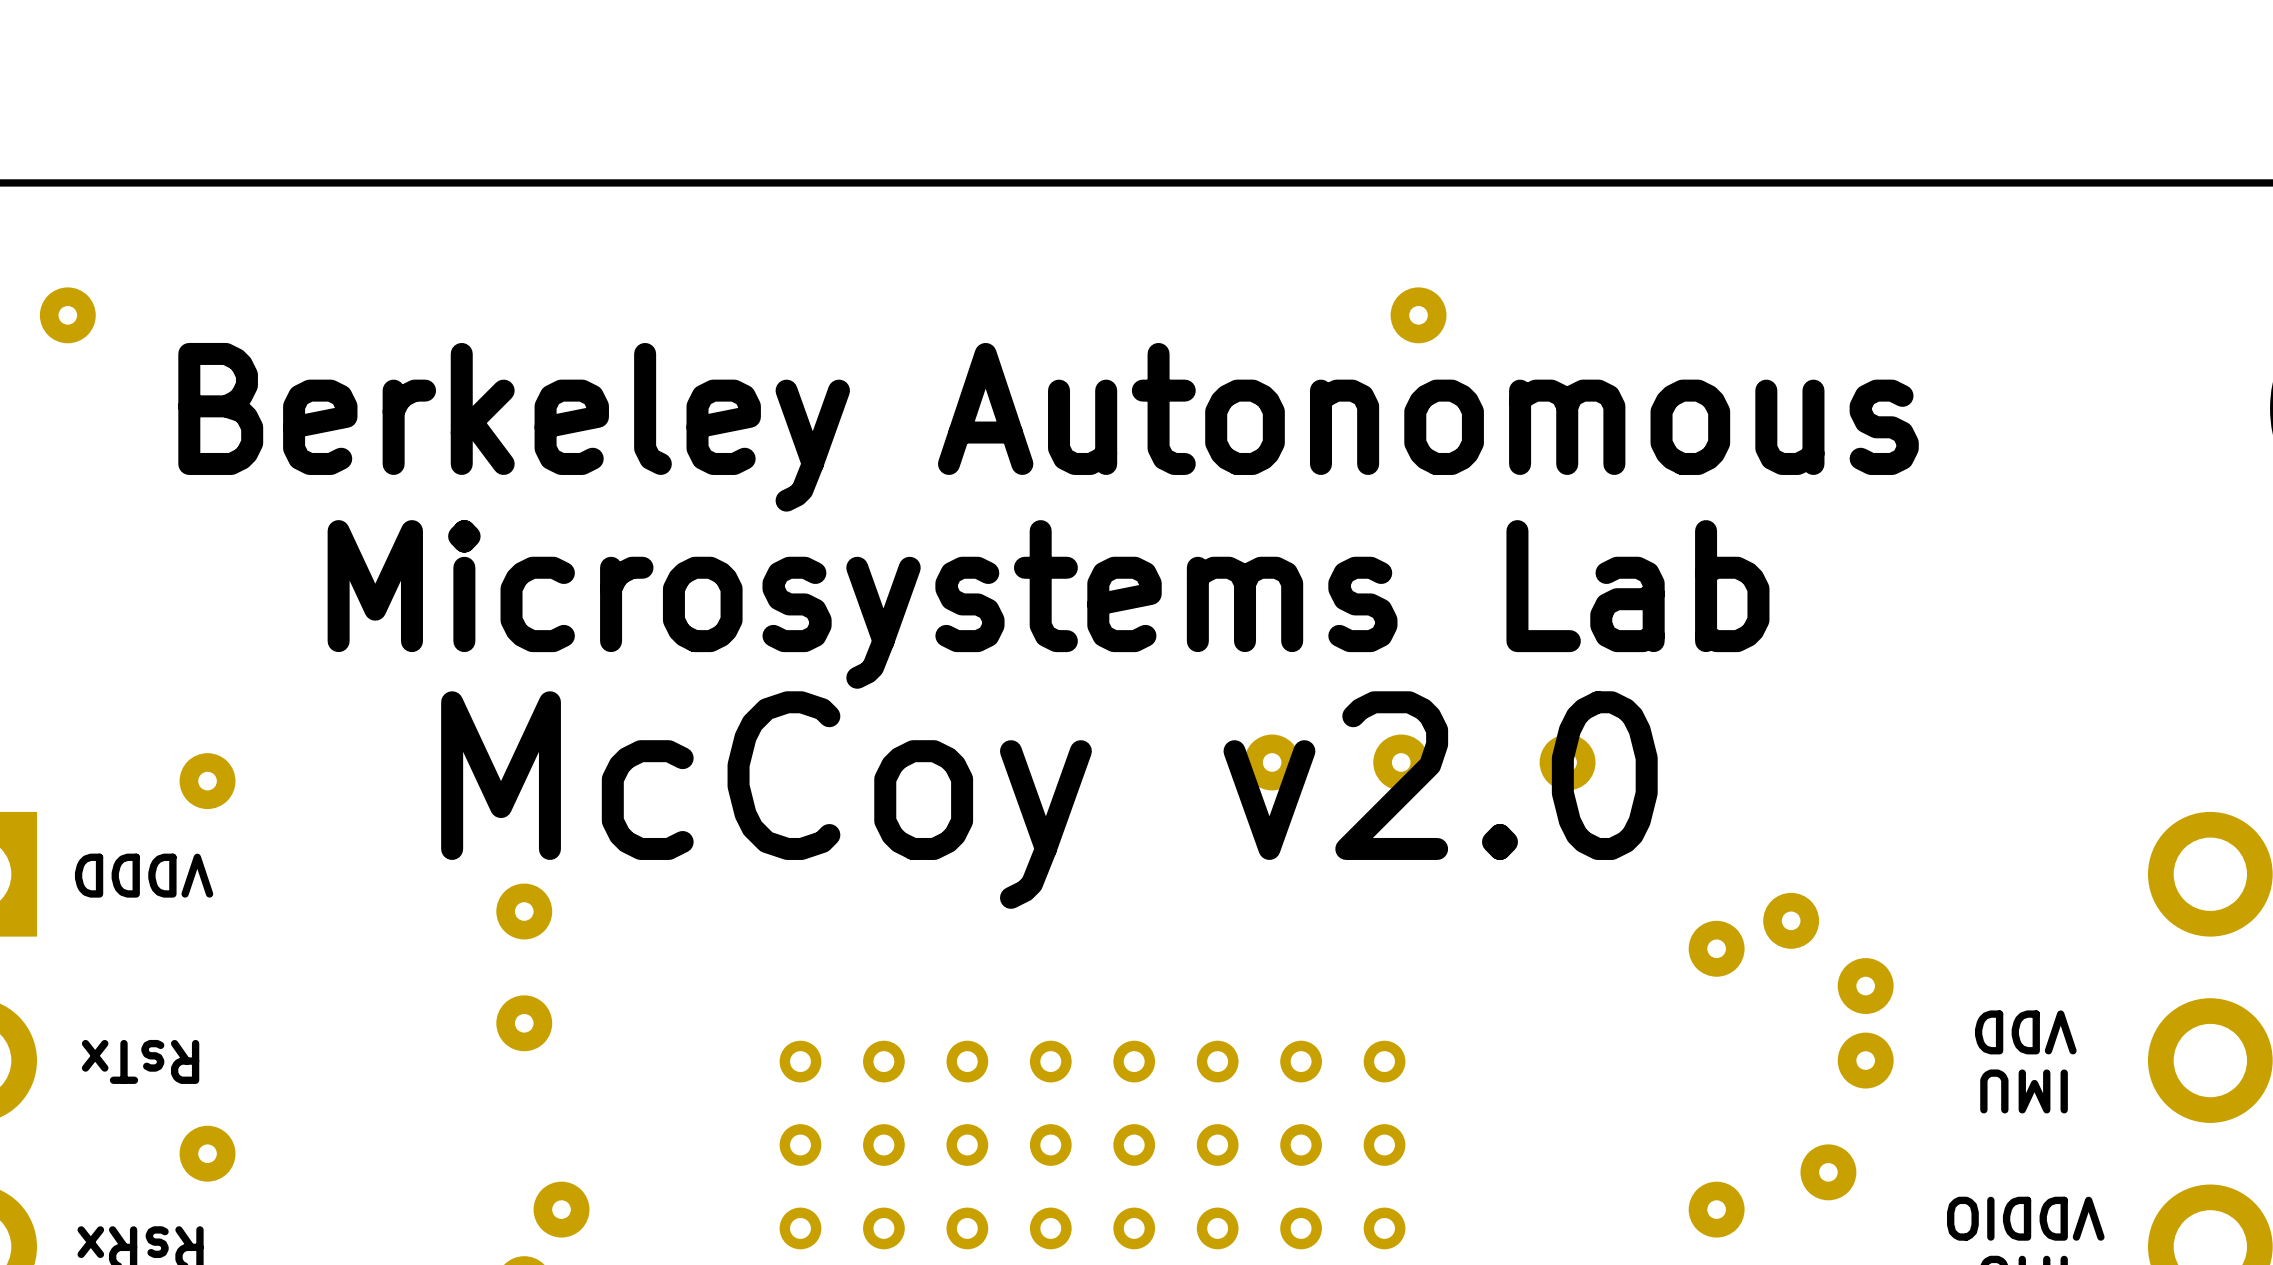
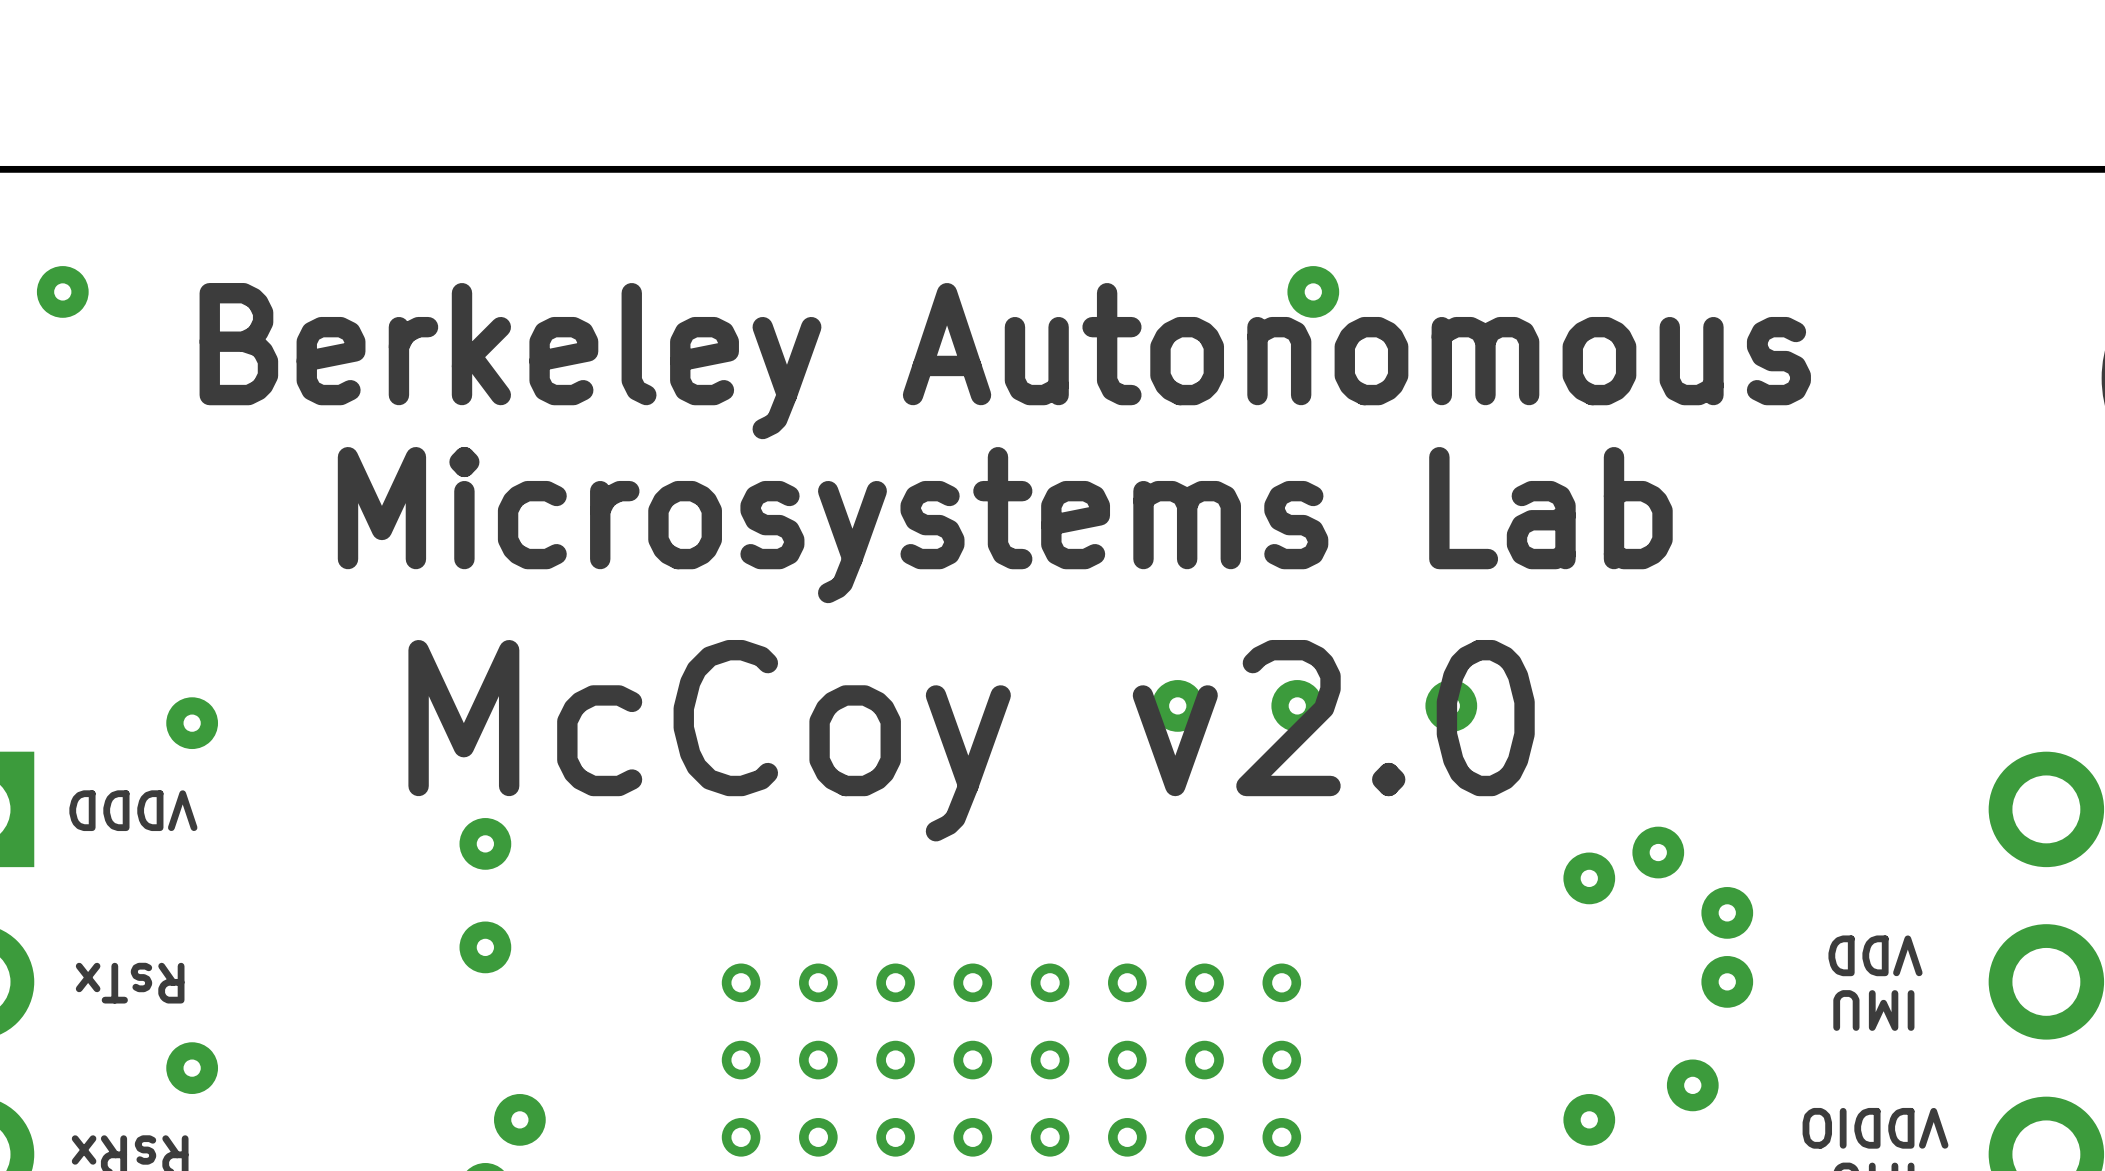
text position: Berkeley Autonomous (1048, 427) -> Berkeley Autonomous (1005, 361)
text position: Microsystems Lab (1048, 604) -> Microsystems Lab (1005, 525)

